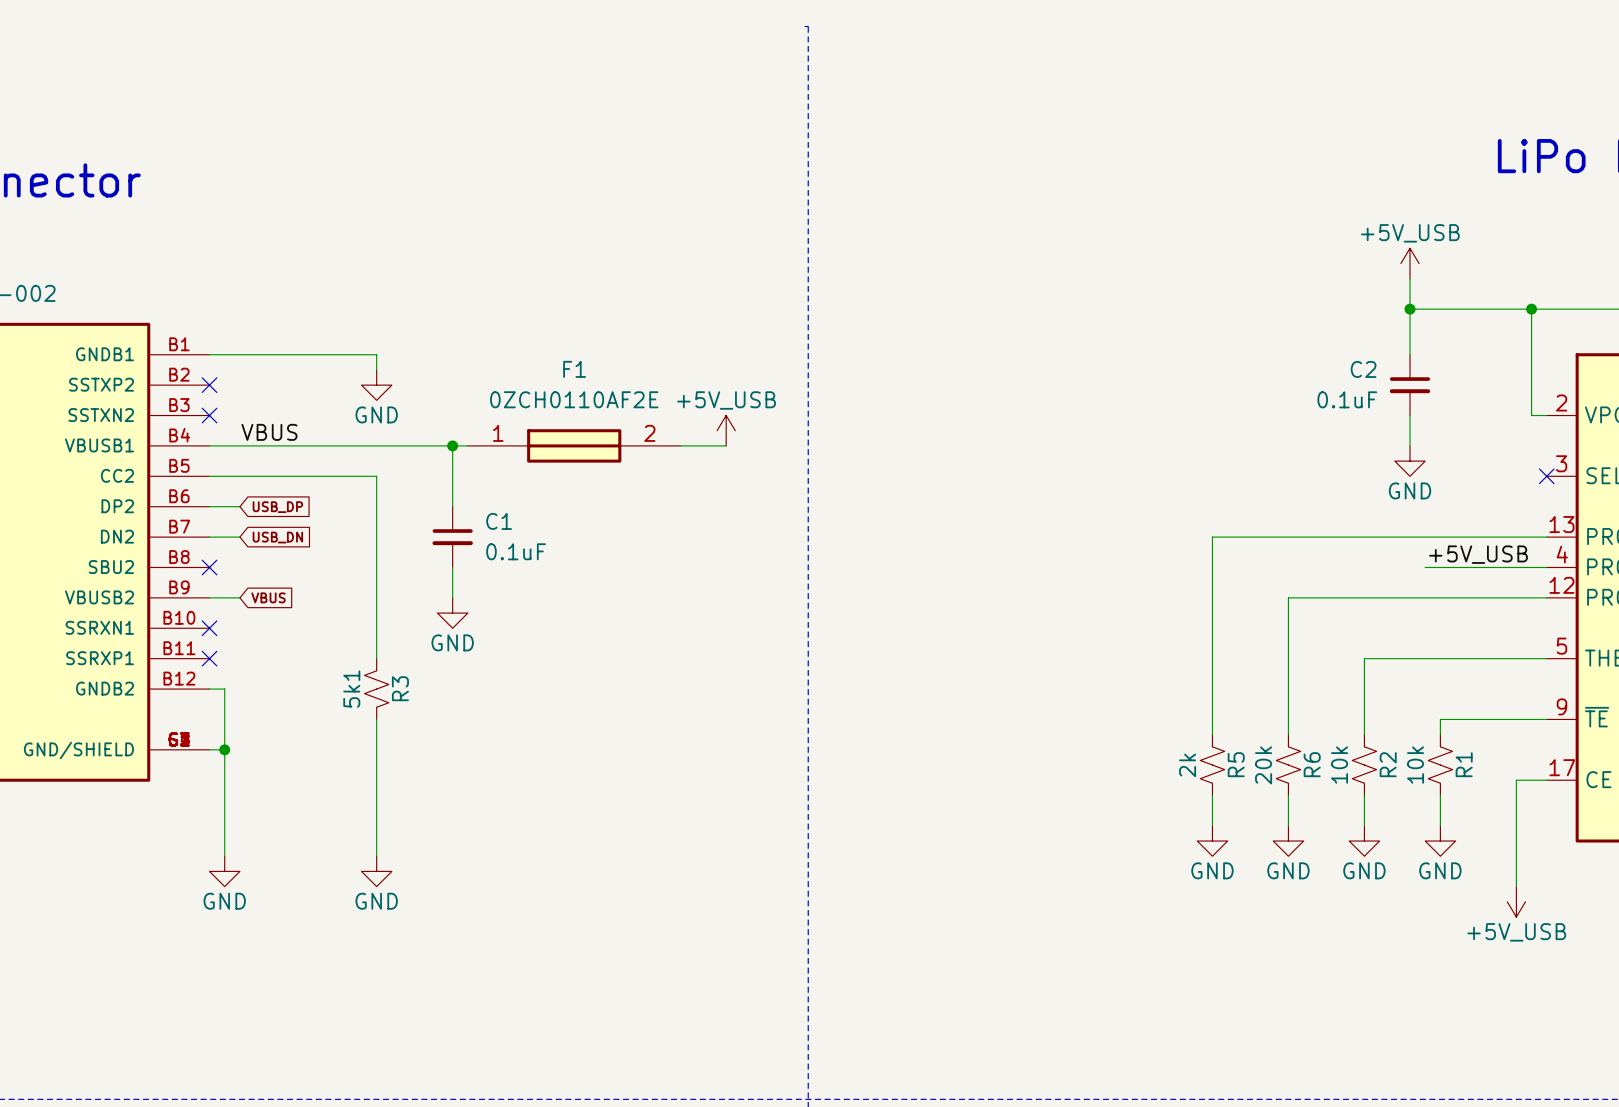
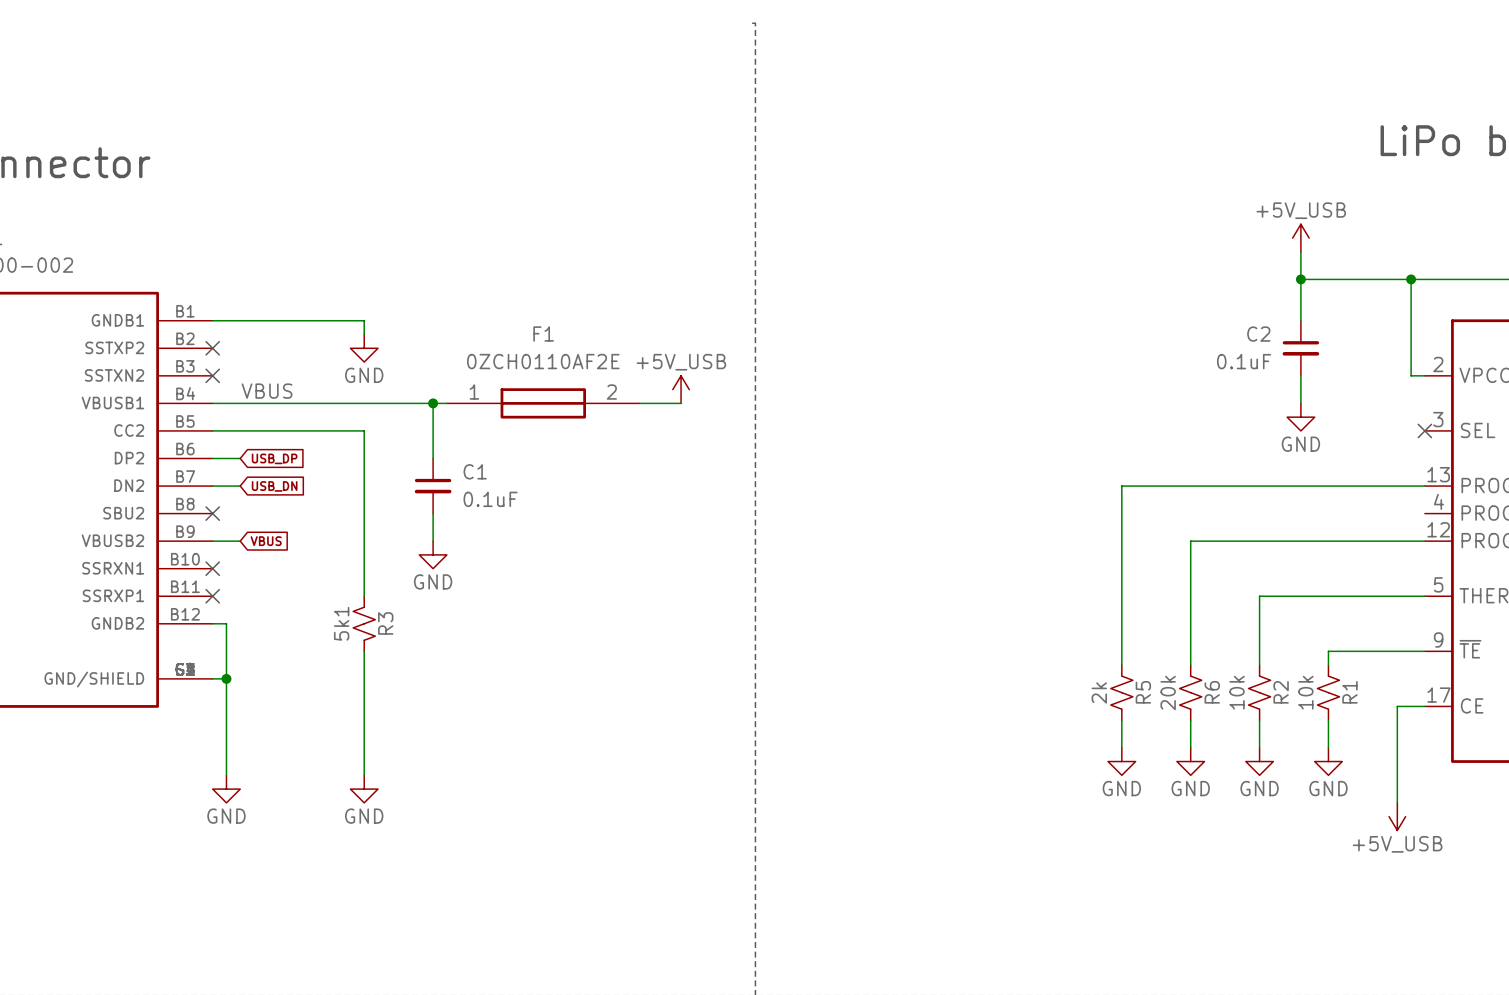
label: +5V_USB (1478, 554) -> none
wire: (1425, 567) (1546, 567) -> none

